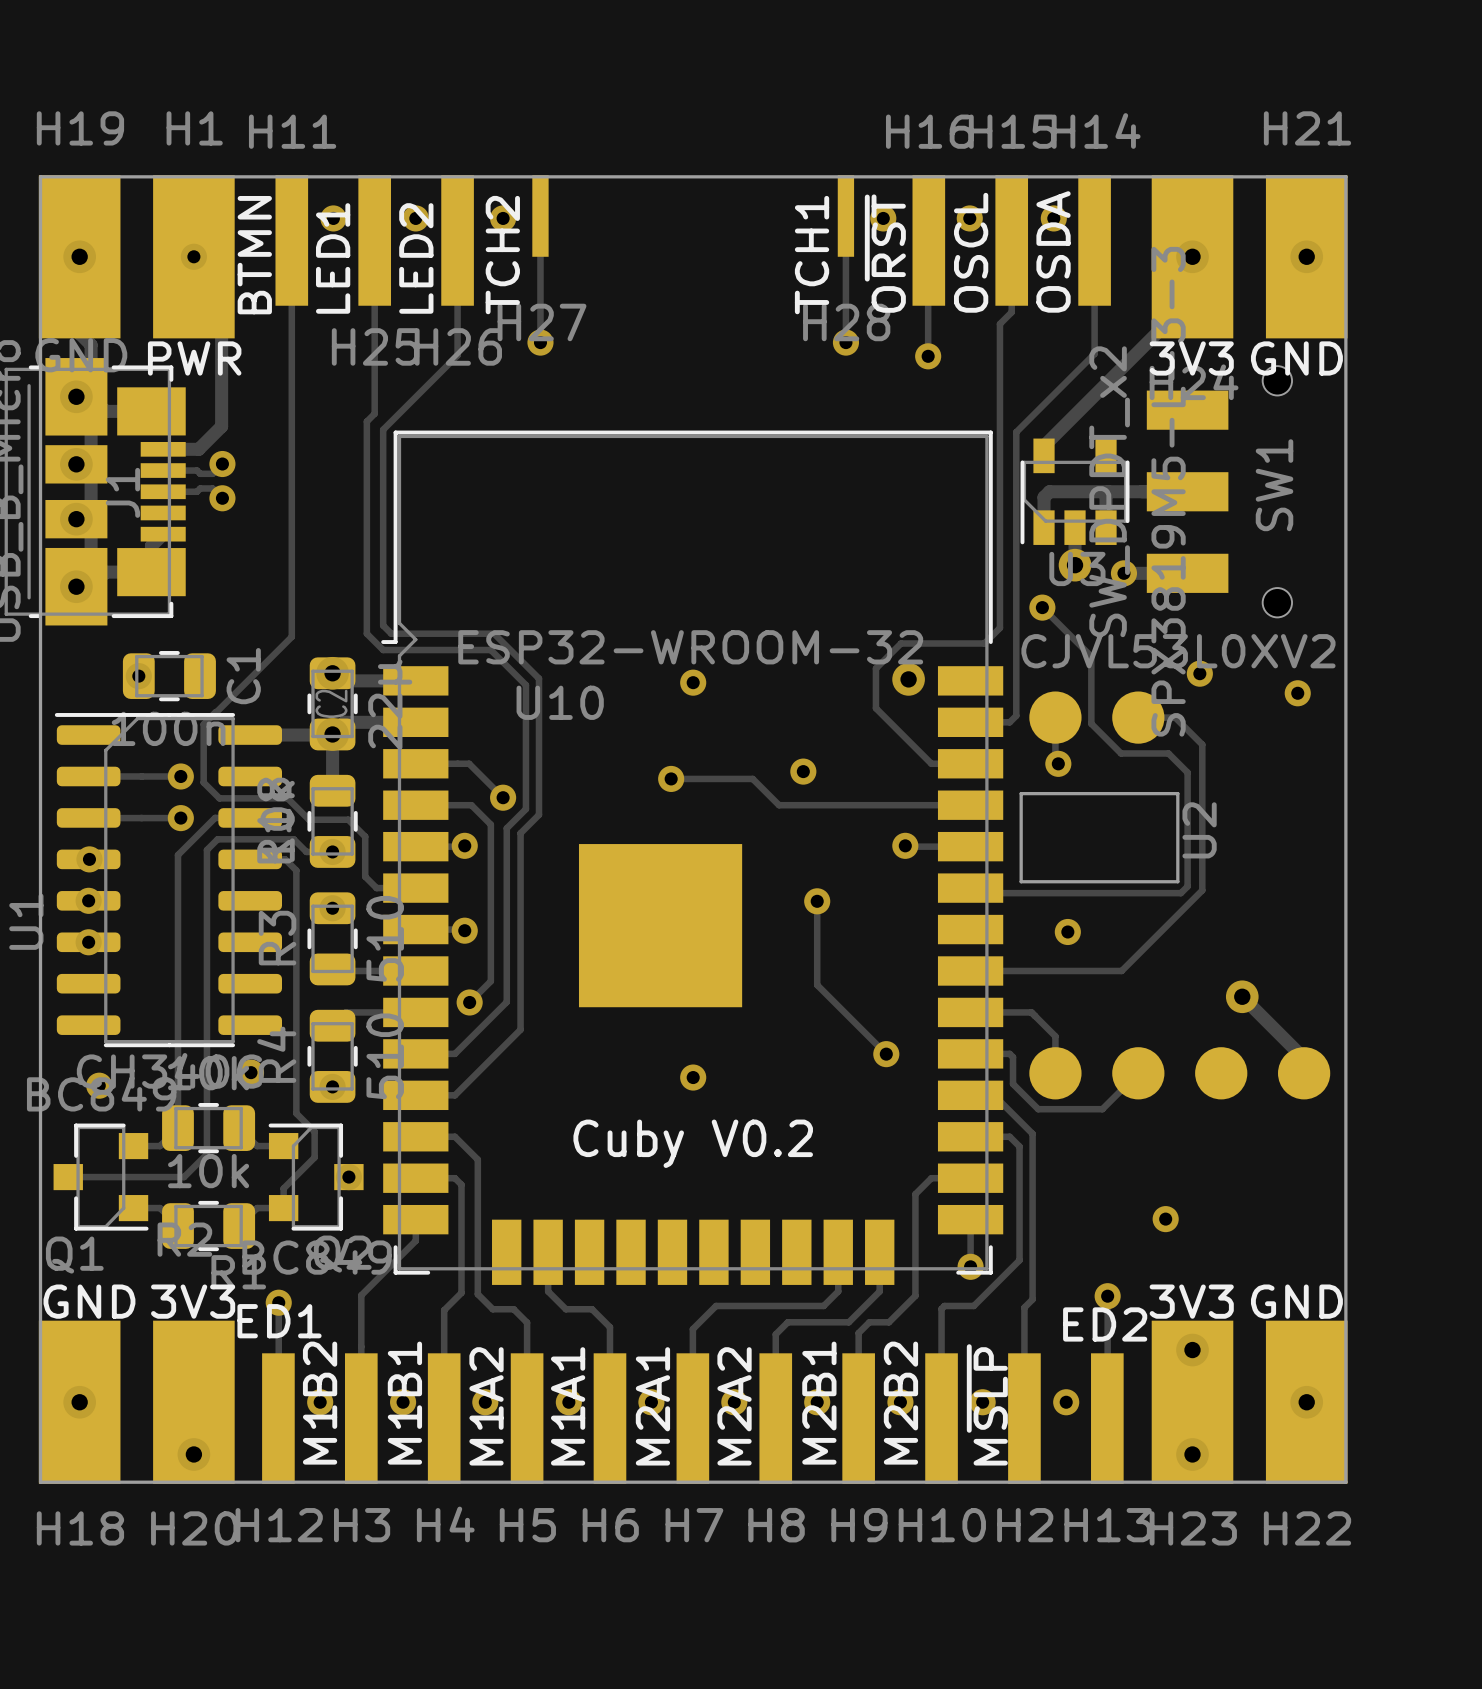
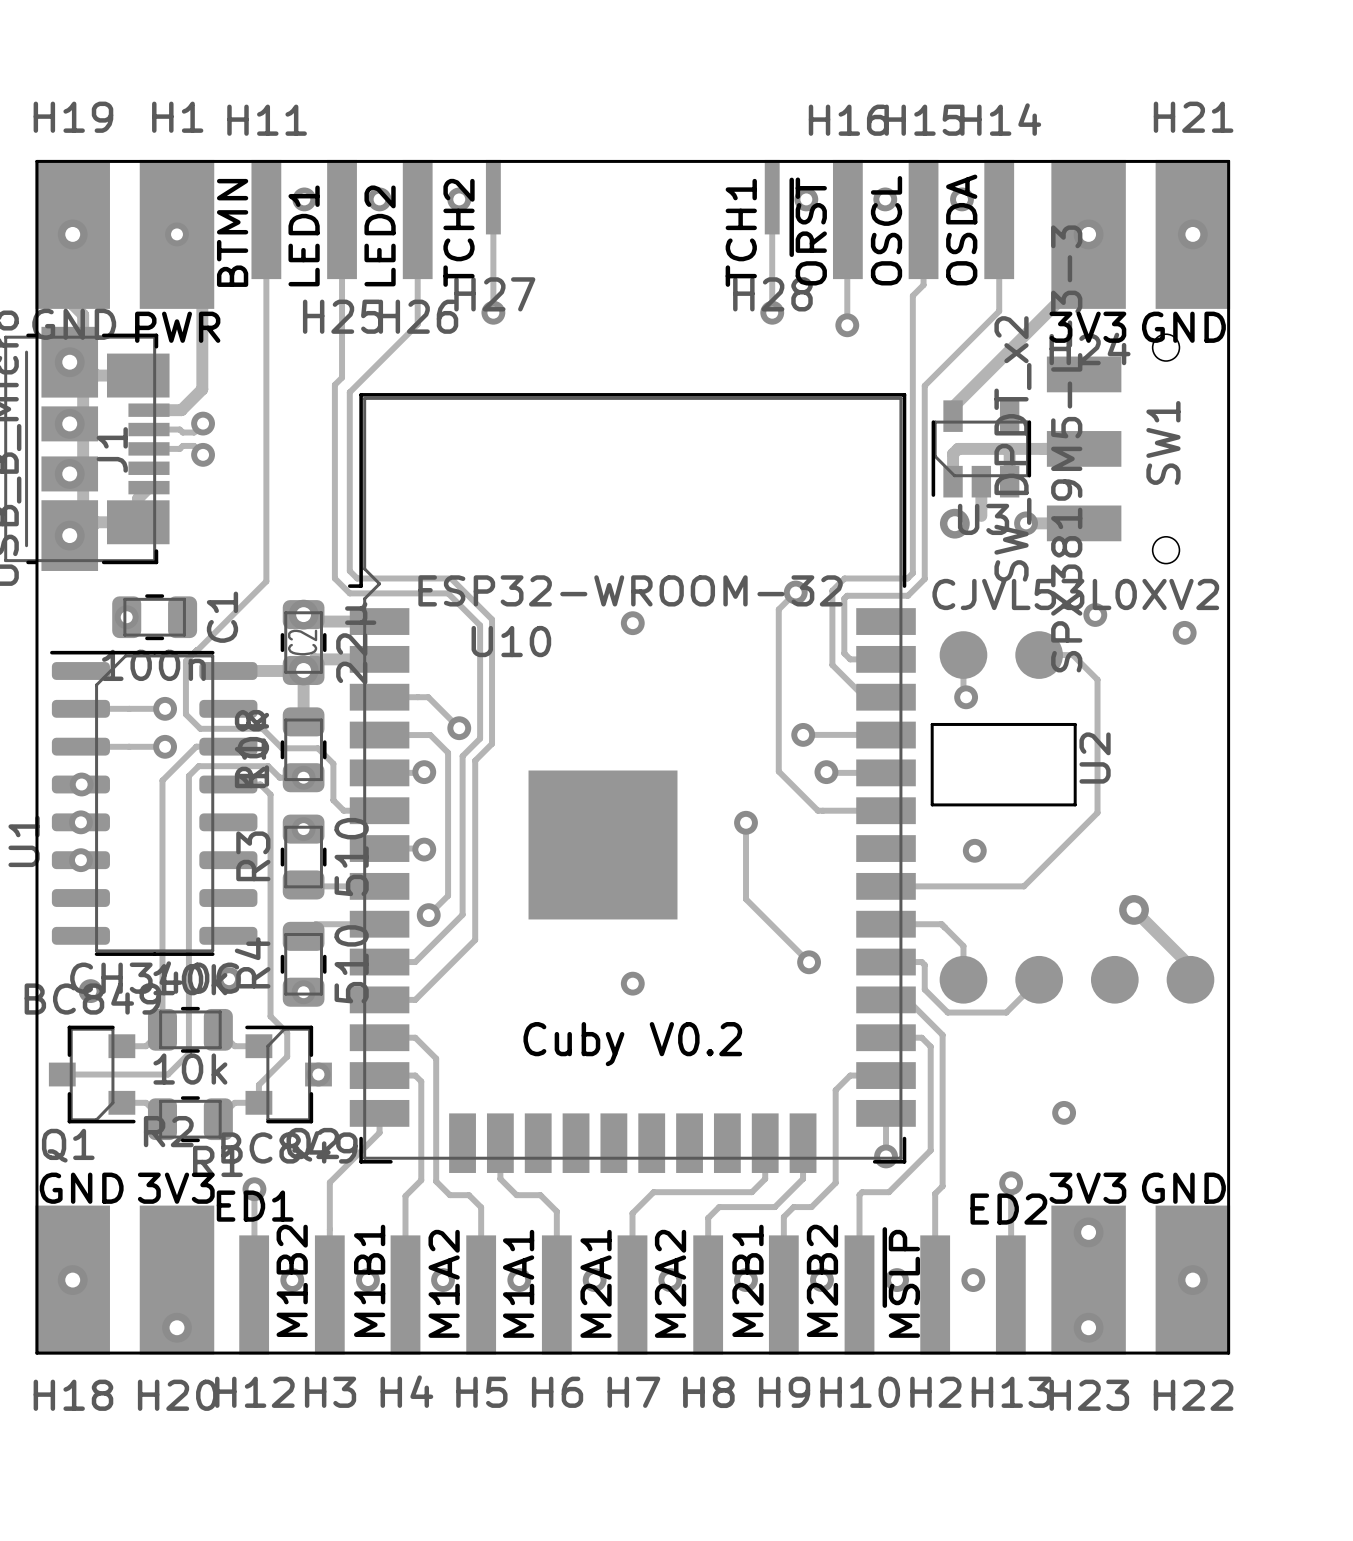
track: (1094, 340) (1094, 353) (1016, 432) (1016, 715) (1009, 722) (970, 722) -> (999, 311) (924, 385) (924, 578) (907, 595) (847, 595) (844, 598) (844, 653) (850, 659) (886, 659)
via position: (1075, 565) -> (954, 523)
track: (1042, 607) (1091, 656) (1091, 723) (1121, 753) (1168, 753) (1187, 772) (1187, 886) (1180, 893) (975, 893) (970, 888) -> (795, 592) (778, 609) (778, 771) (817, 810) (886, 810)
via: (1042, 607) -> none
track: (994, 633) (984, 643) (901, 643) (875, 668) (875, 708) (931, 763) (947, 763) -> (907, 578) (844, 578) (832, 590) (832, 665) (864, 697)
via: none -> (795, 592)
via: (908, 679) -> none
via: (803, 771) -> none
track: (671, 778) (752, 778) (779, 805) (879, 805) -> none
via: (671, 778) -> none
via: none -> (803, 734)

